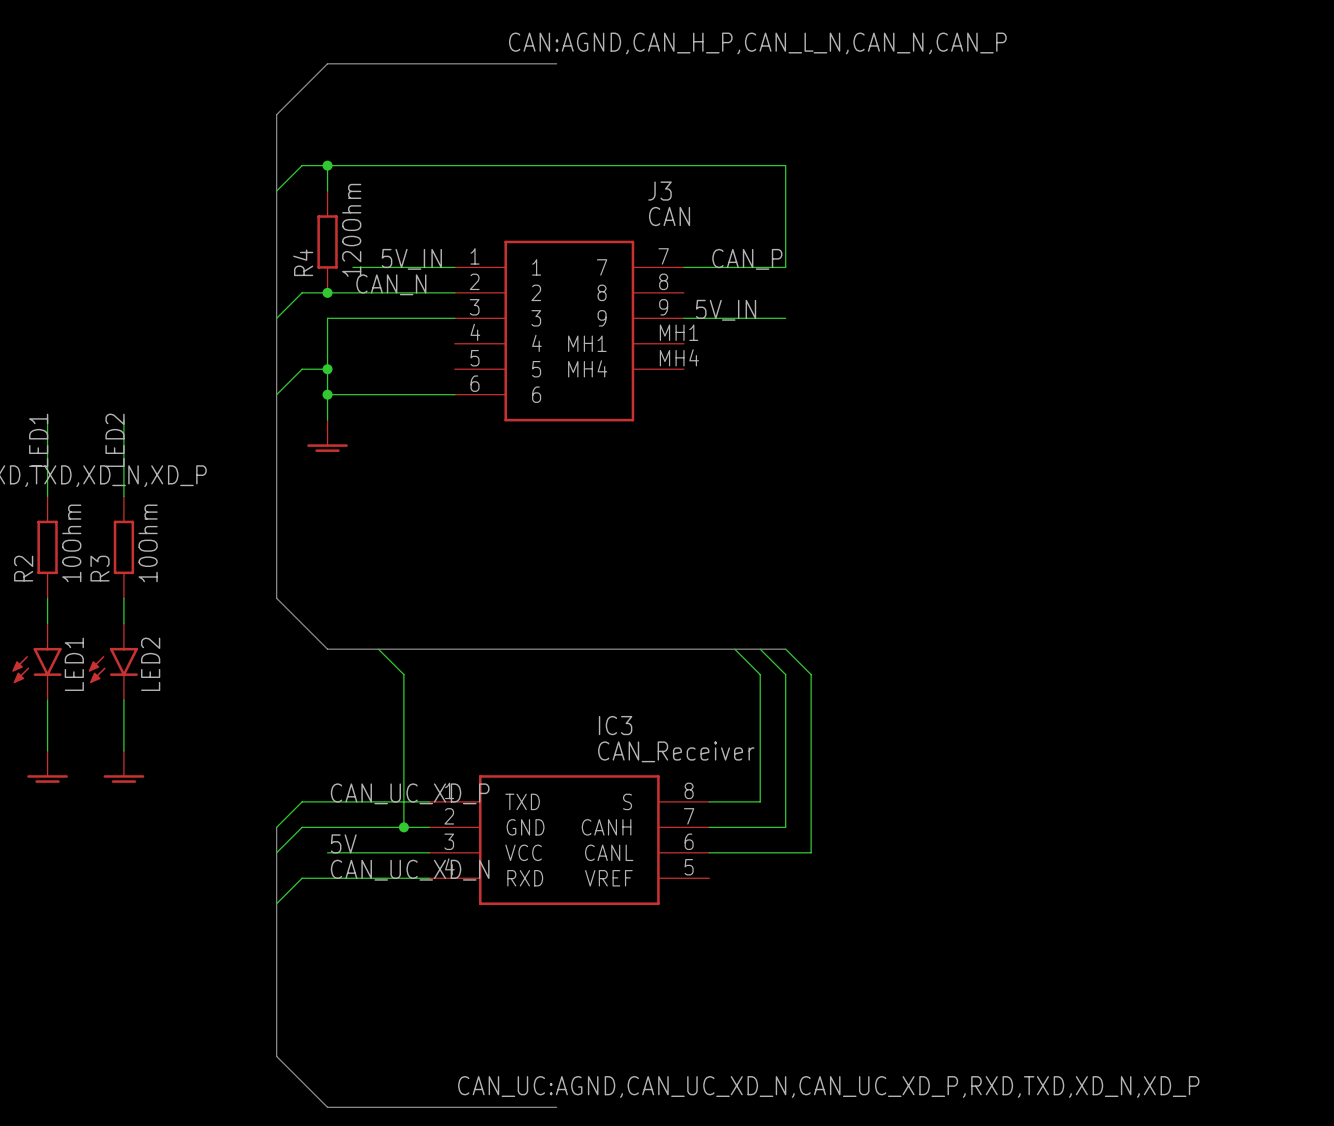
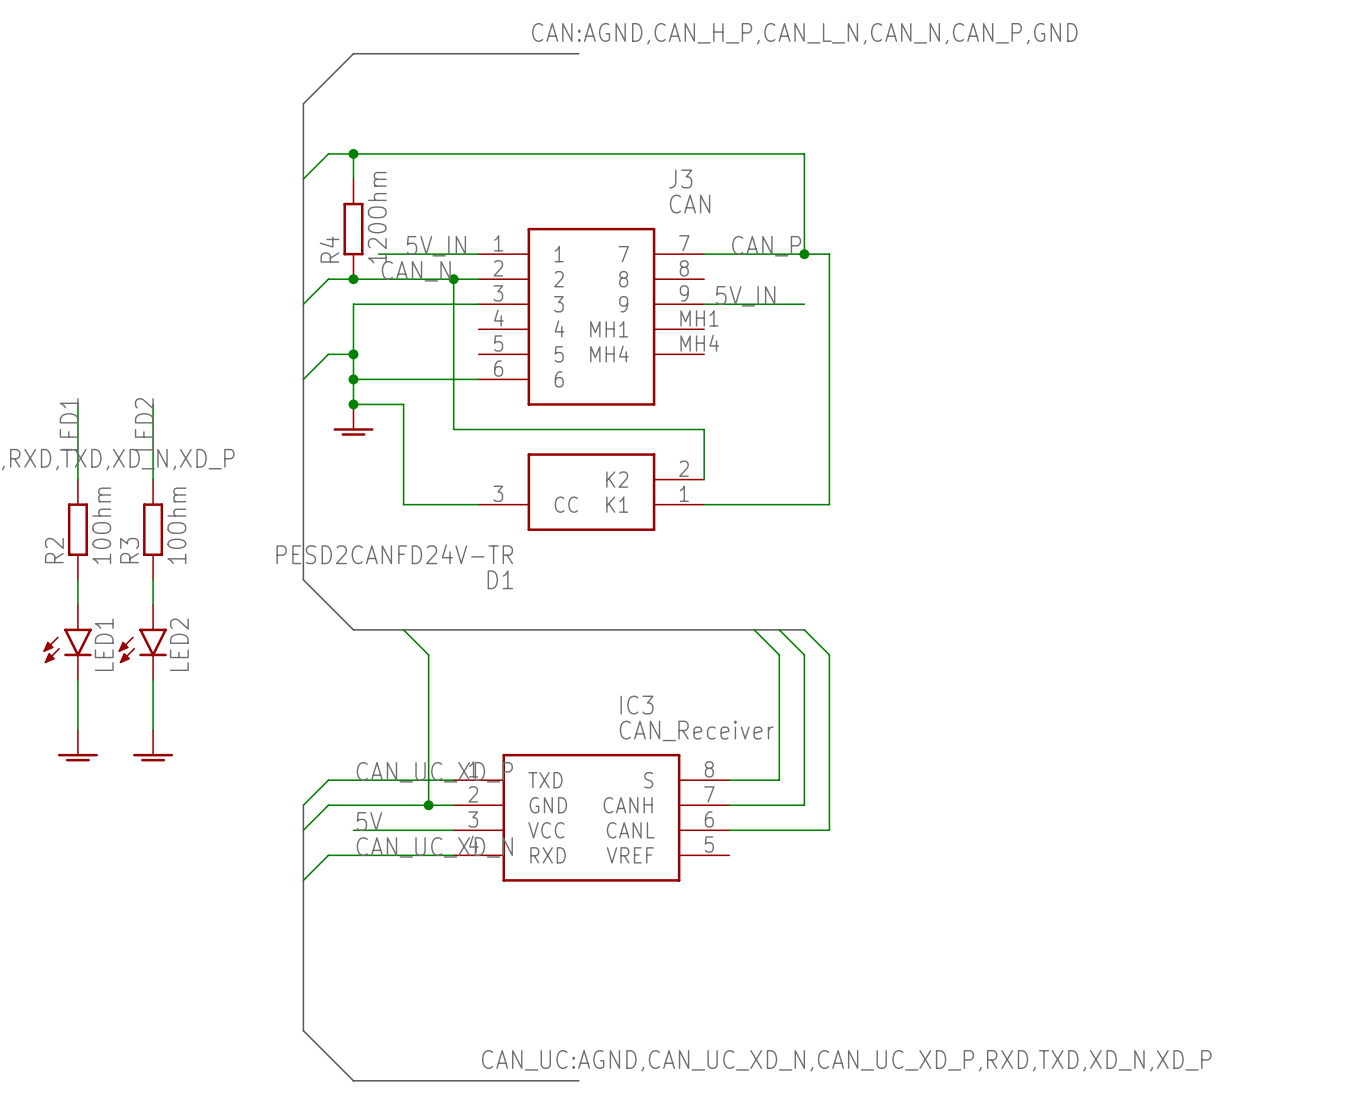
label: CAN:AGND,CAN_H_P,CAN_L_N,CAN_N,CAN_P (757, 43) -> CAN:AGND,CAN_H_P,CAN_L_N,CAN_N,CAN_P,GND (804, 33)
wire: none -> (804, 254) (829, 254) (829, 504) (704, 504)
junction: none -> (804, 254)
wire: none -> (453, 279) (453, 429) (704, 429) (704, 479)
junction: none -> (453, 279)
wire: none -> (353, 404) (403, 404) (403, 504) (478, 504)
junction: none -> (353, 404)
D1: none -> PESD2CANFD24V-TR (591, 492)

